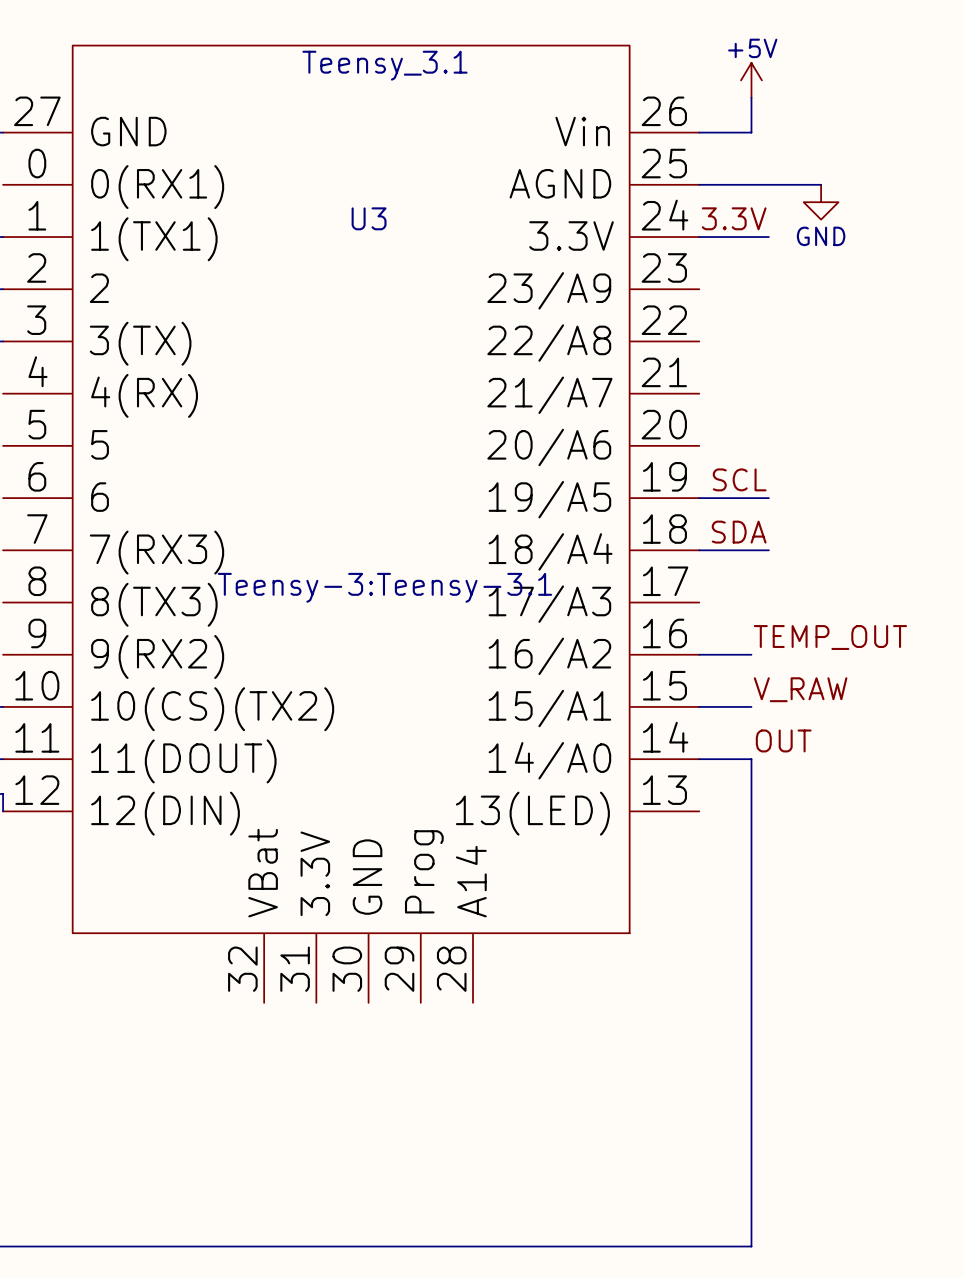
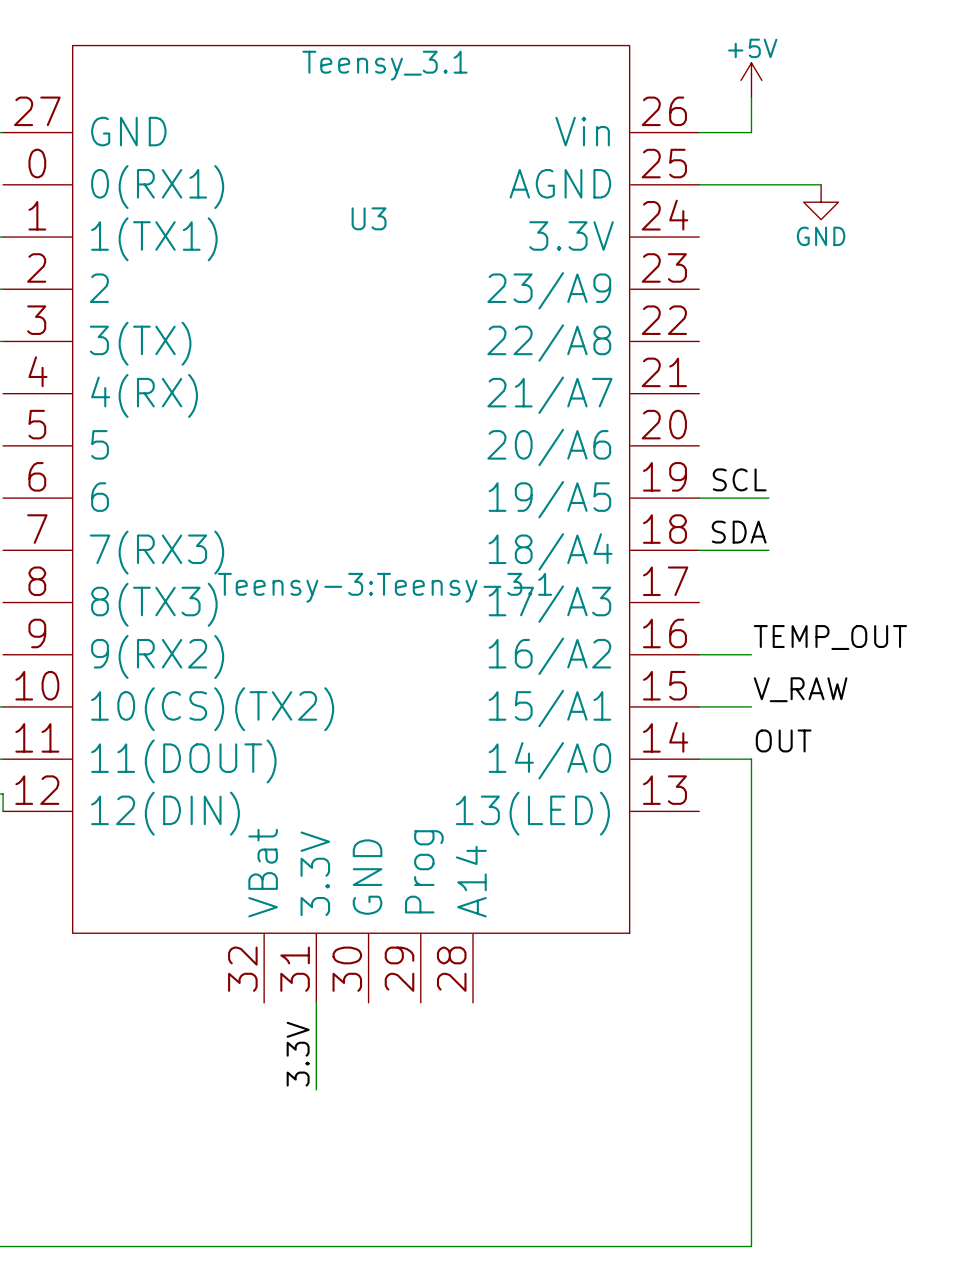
label: 3.3V (734, 218) -> none
wire: (699, 237) (768, 237) -> none
wire: none -> (316, 1002) (316, 1089)
label: none -> 3.3V (298, 1054)

